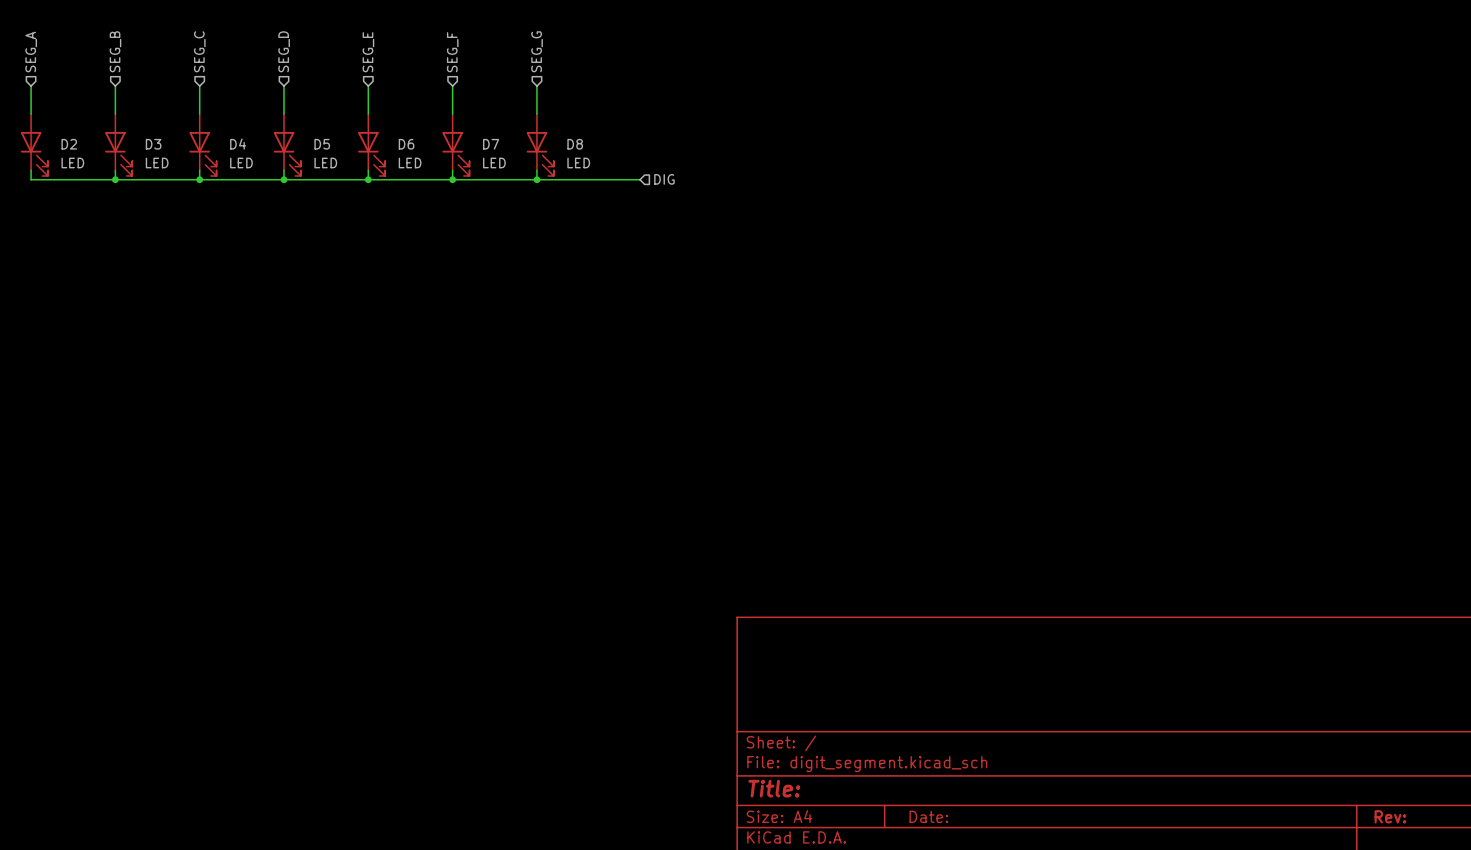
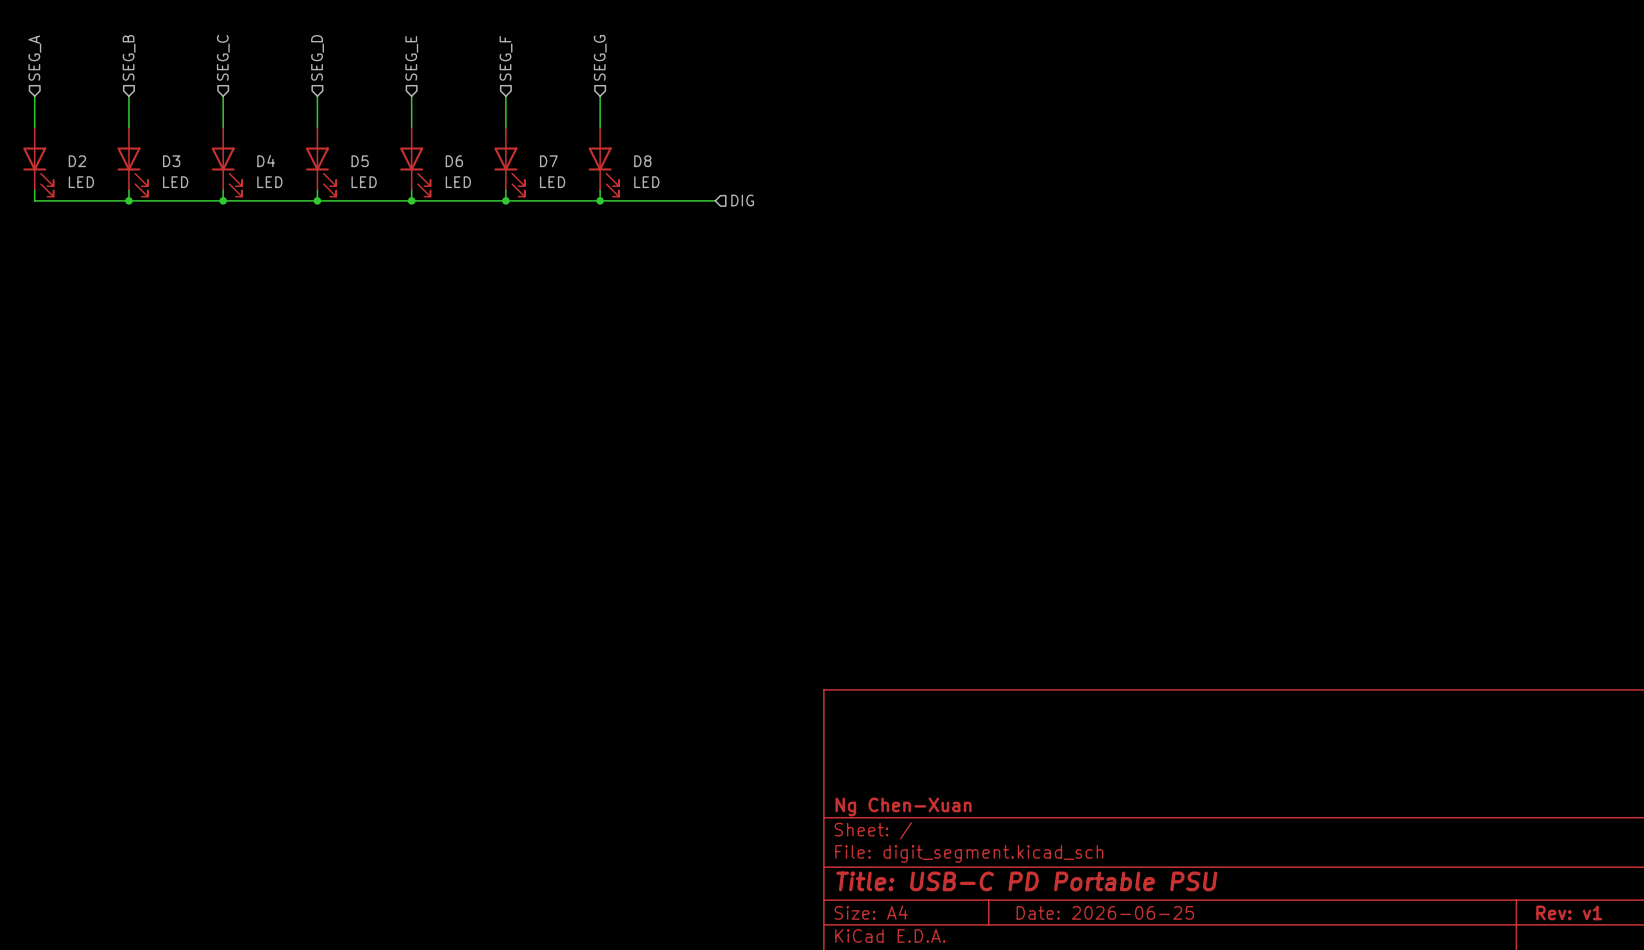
title block: none -> Ng Chen-Xuan (903, 806)
title block: Title: (774, 788) -> Title: USB-C PD Portable PSU (1026, 881)
title block: Date: (928, 816) -> Date: 2026-06-25 (1105, 912)
title block: Rev: (1390, 816) -> Rev: v1 (1569, 912)

